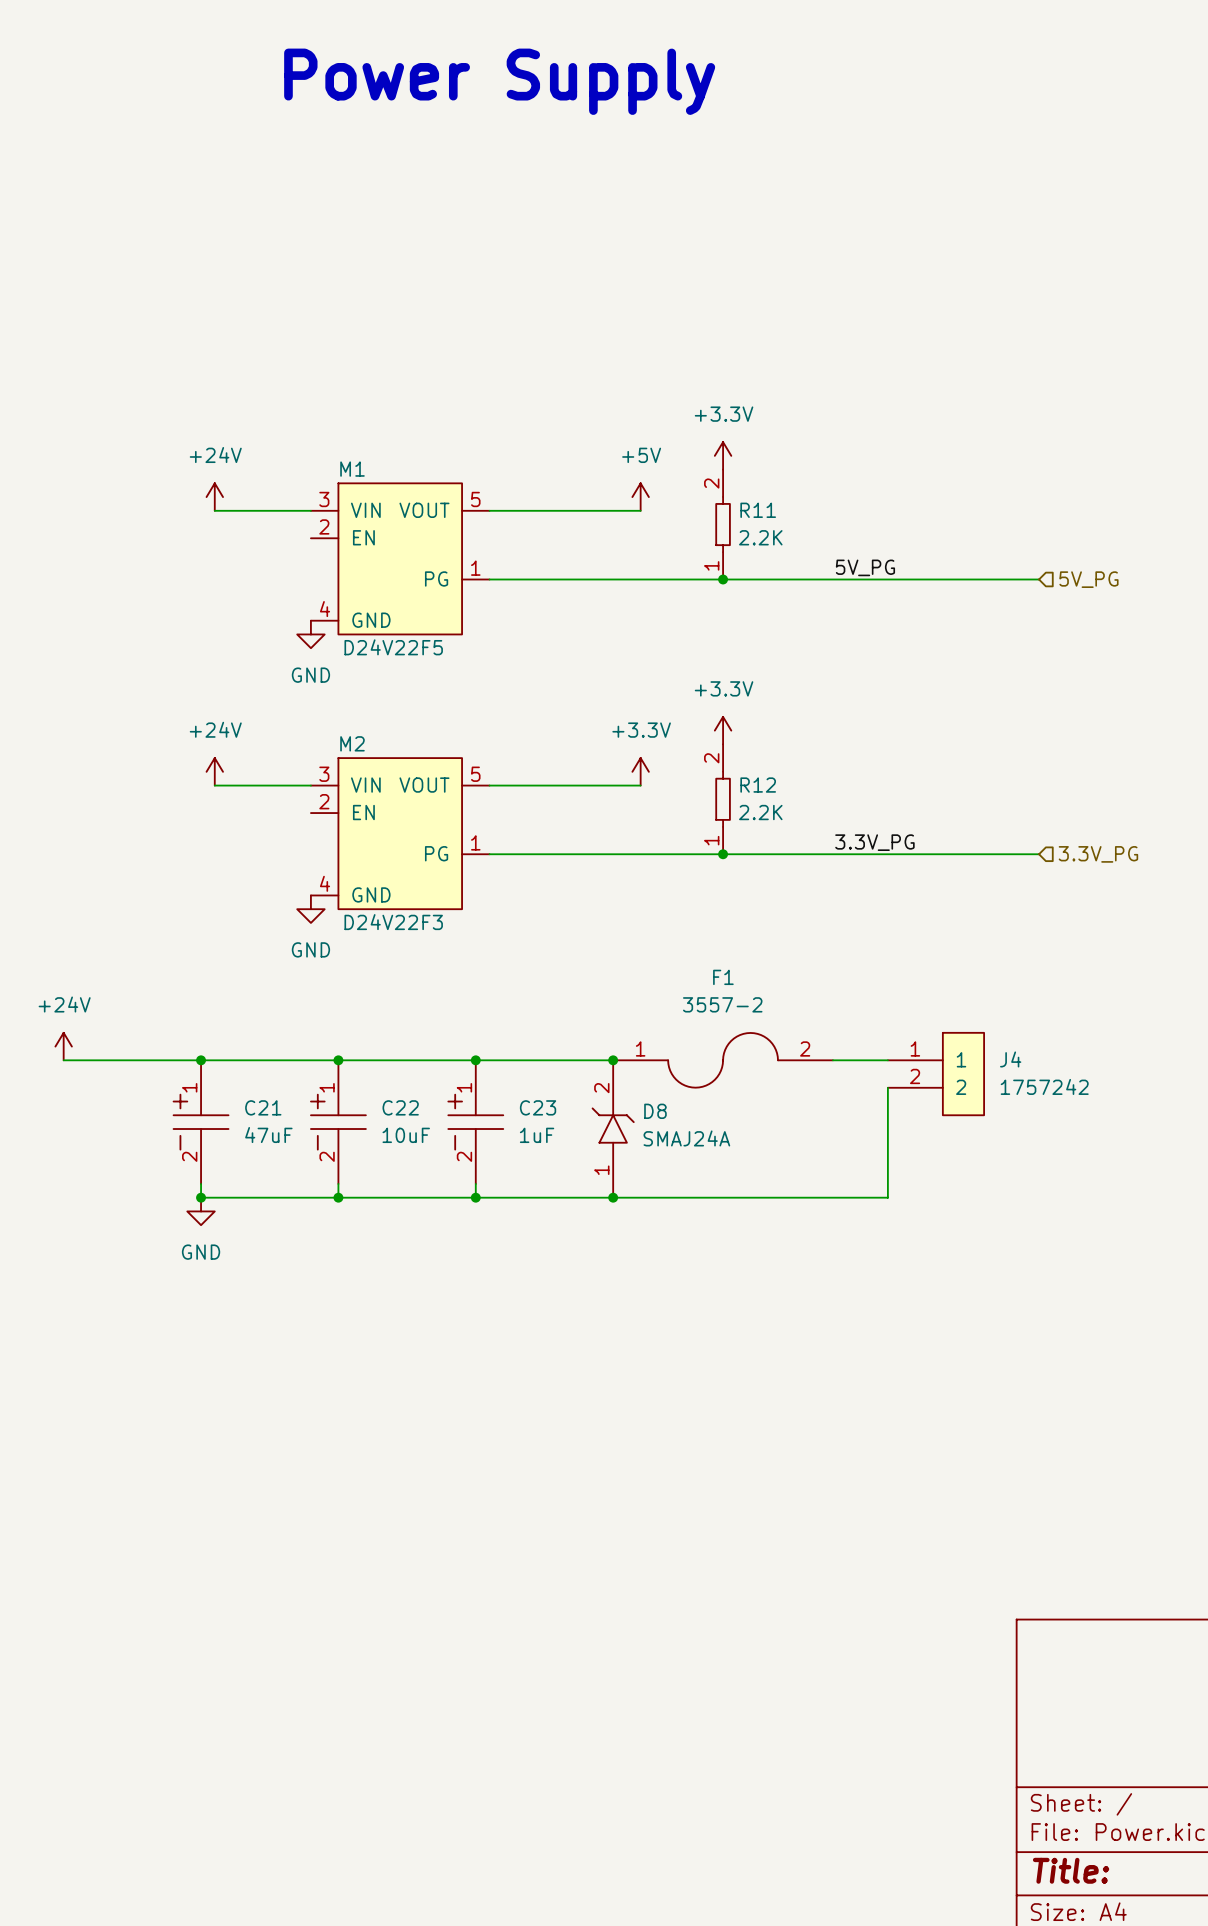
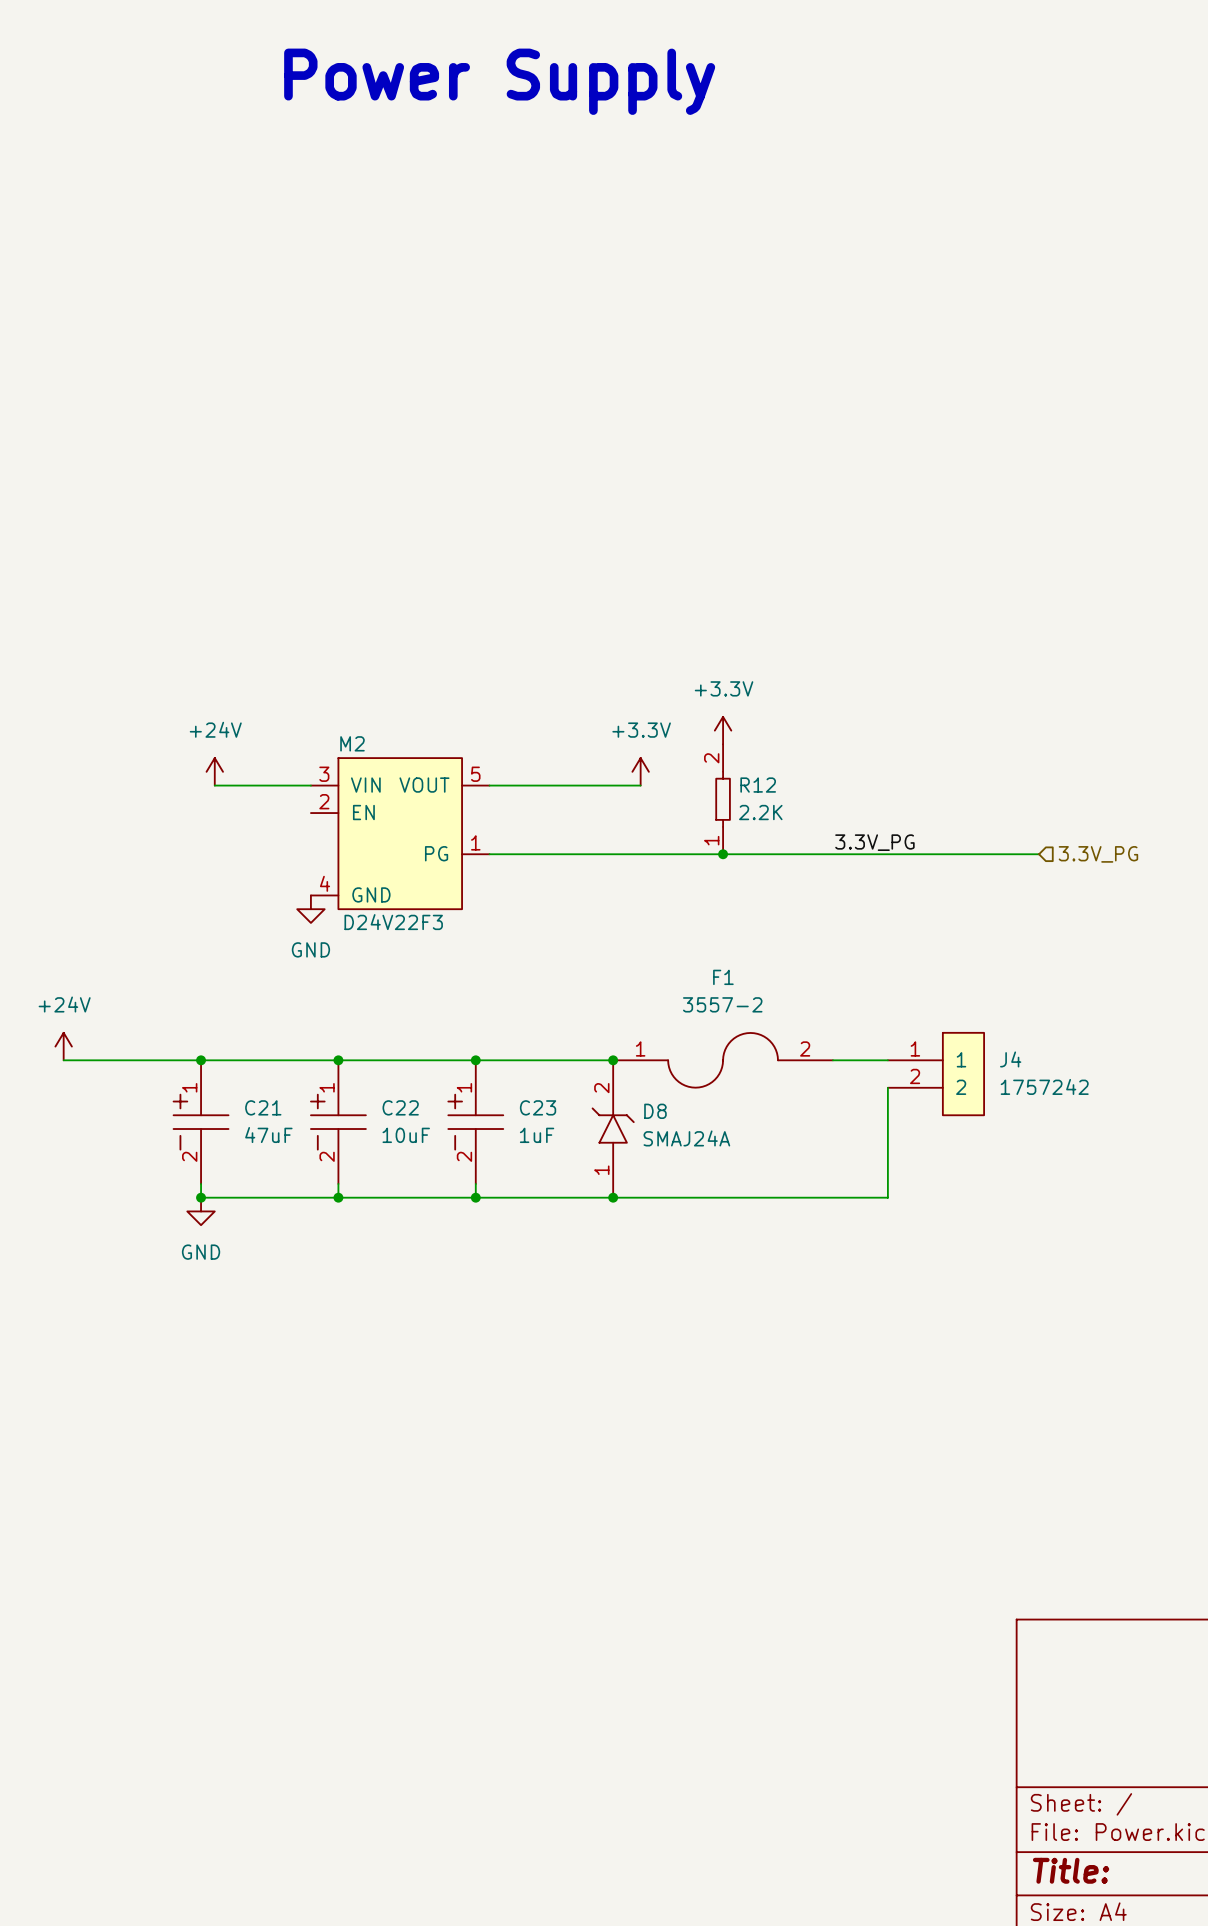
power symbol: +3.3V (723, 455) -> none
power symbol: +24V (214, 497) -> none
power symbol: +5V (640, 497) -> none
wire: (214, 510) (310, 510) -> none
wire: (489, 510) (640, 510) -> none
R11: (723, 524) -> none
M1: (400, 558) -> none
label: 5V_PG (865, 567) -> none
wire: (489, 579) (1039, 579) -> none
junction: (723, 579) -> none
hierarchical label: 5V_PG (1088, 579) -> none
power symbol: GND (310, 634) -> none

